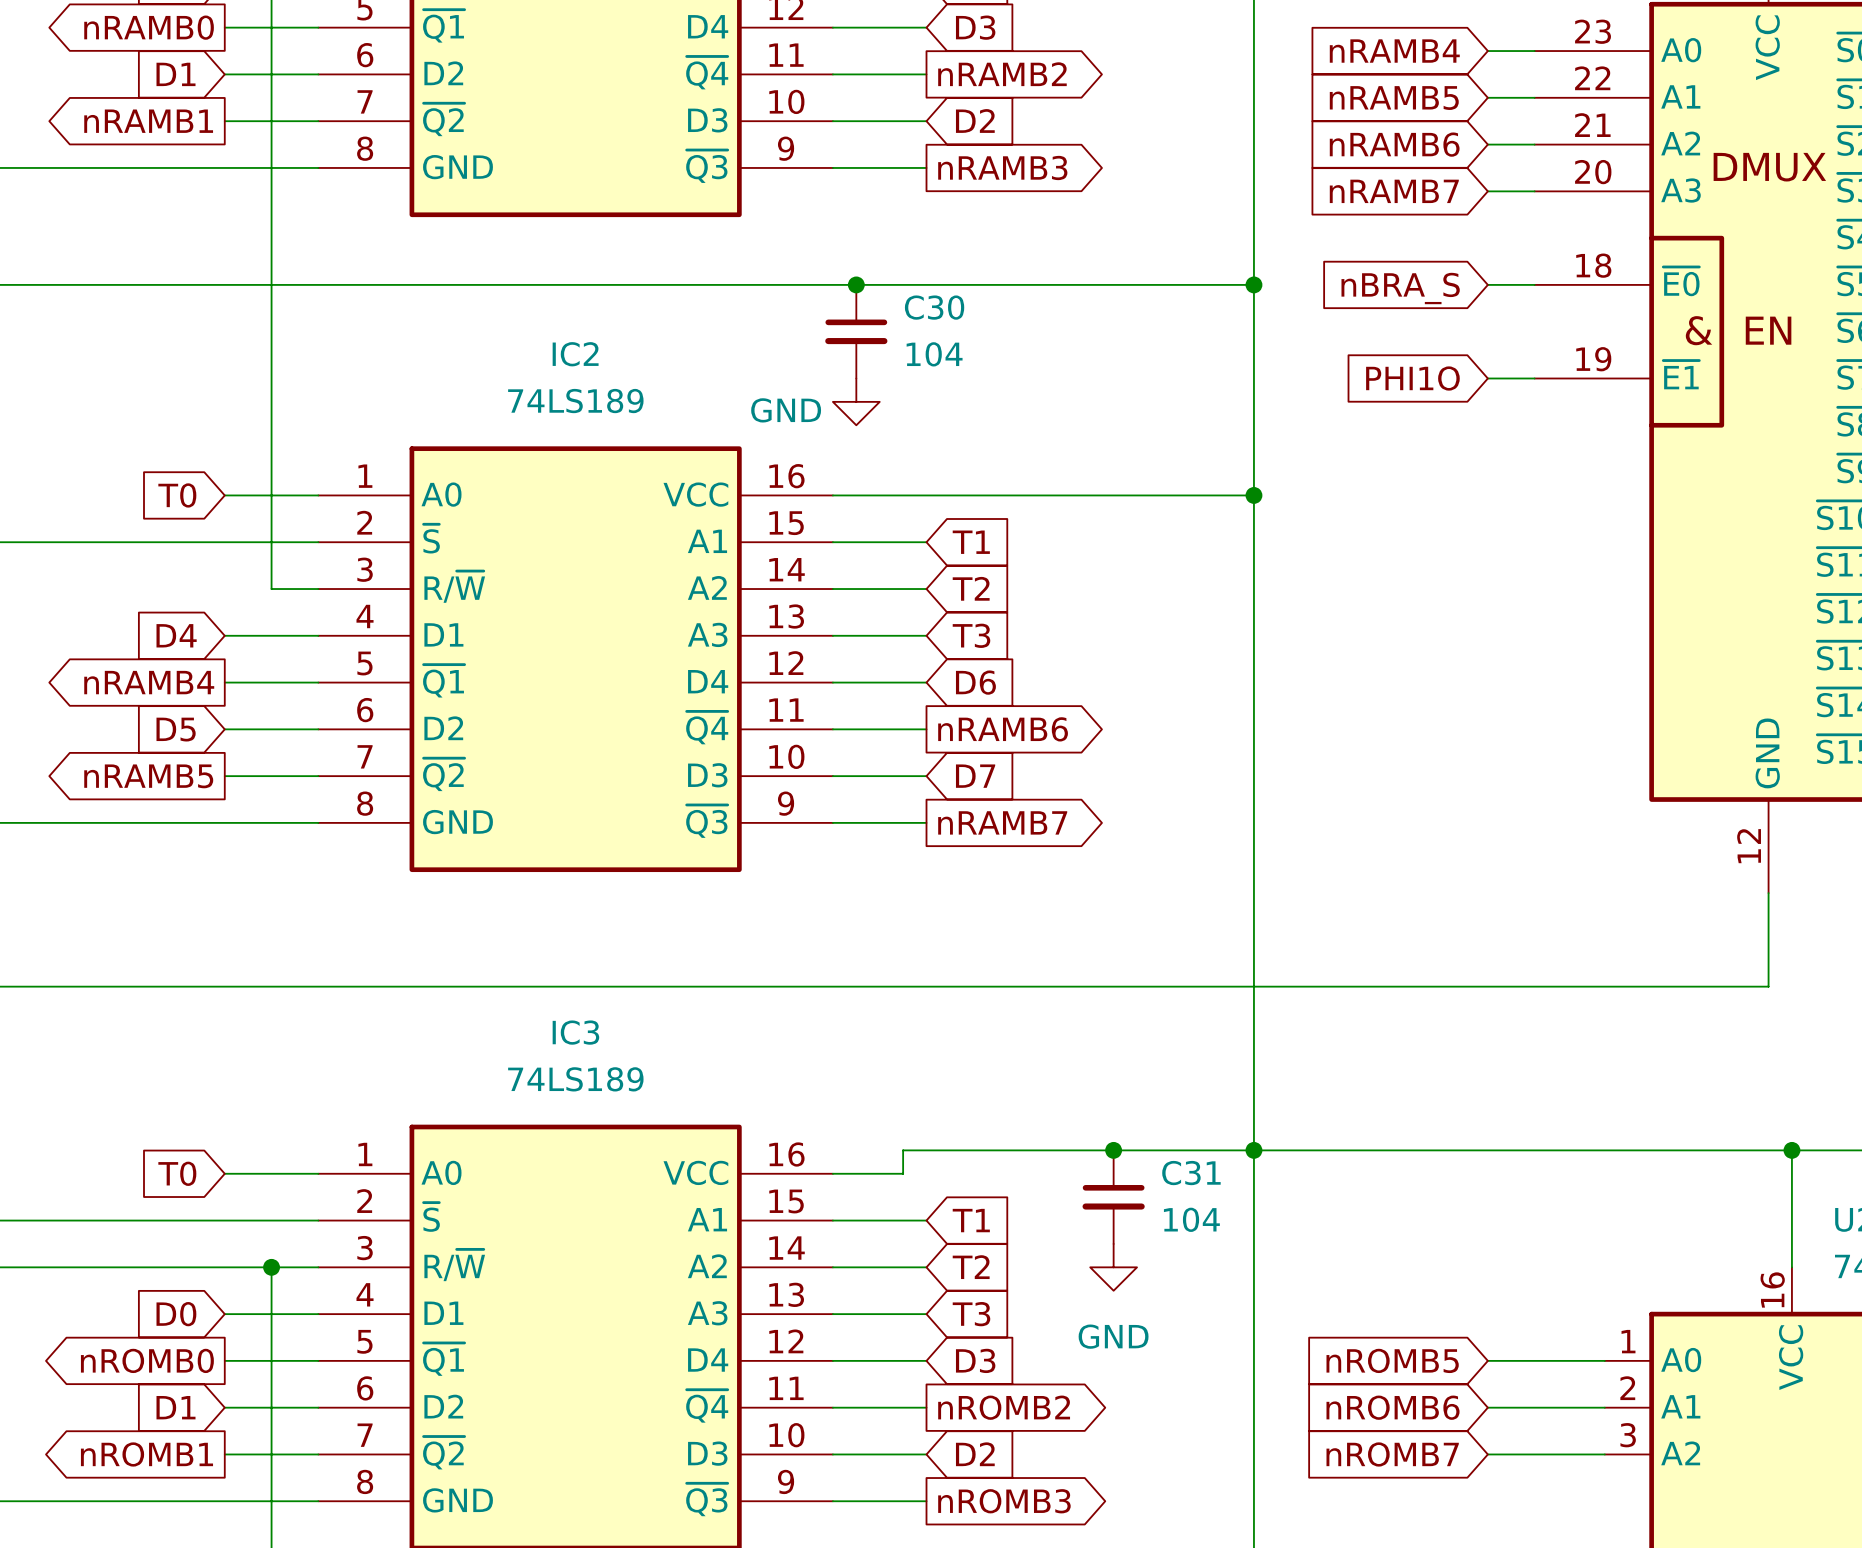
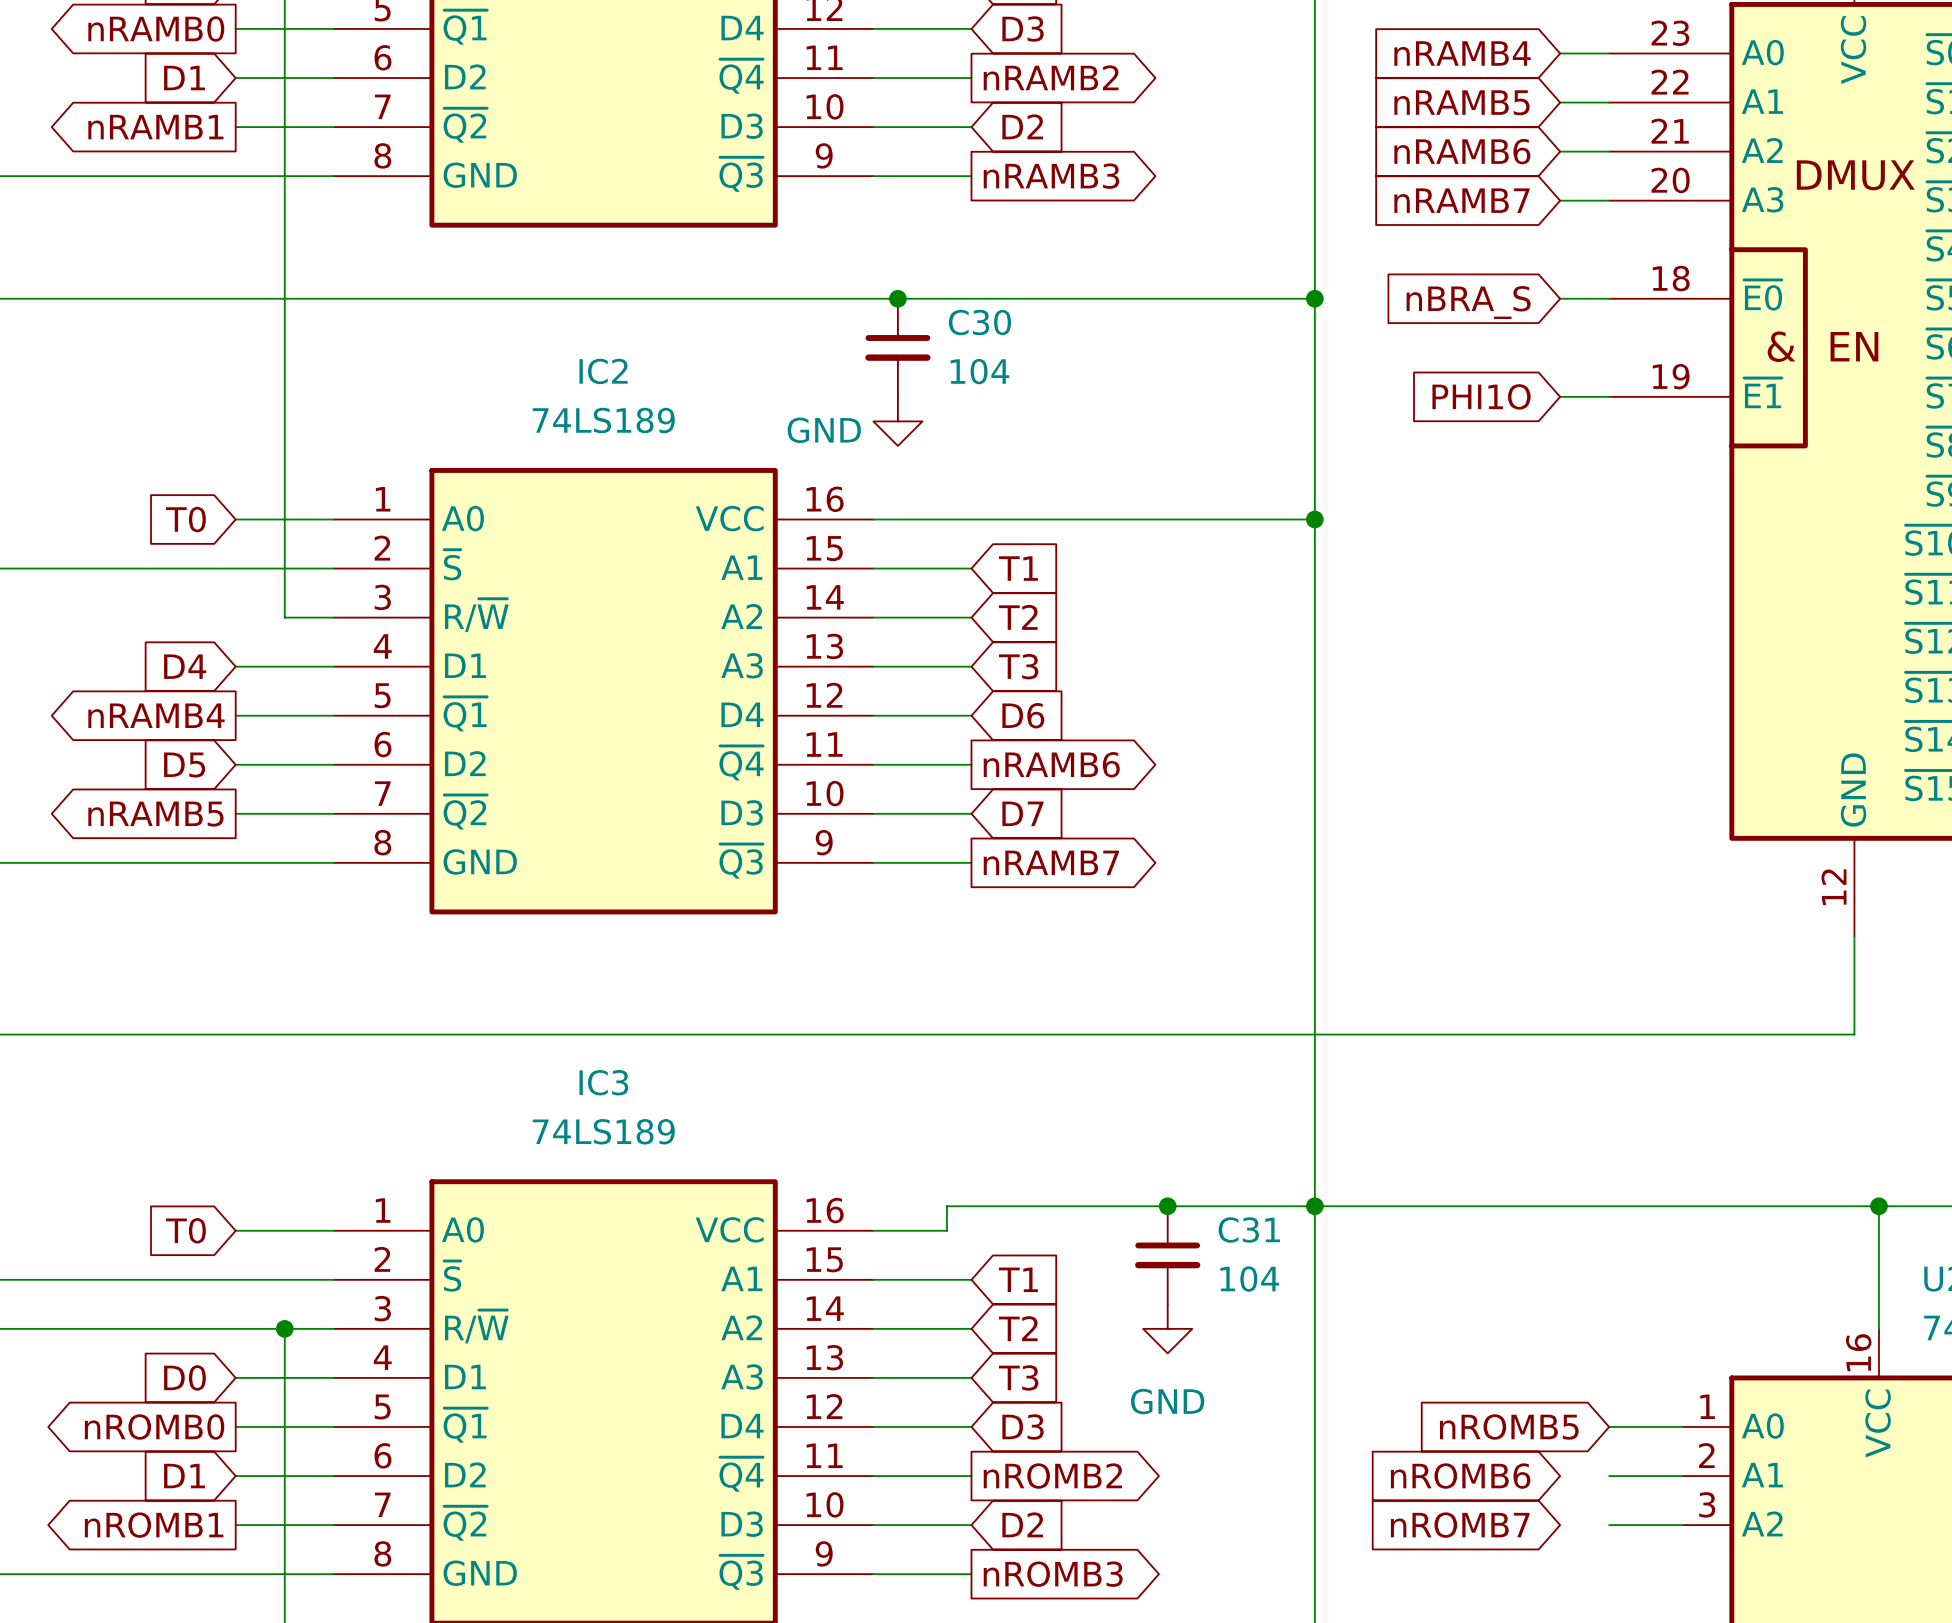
global label position: nROMB5 (1392, 1360) -> nROMB5 (1509, 1427)
wire: (1487, 1360) (1534, 1360) -> none
wire: (1487, 1407) (1534, 1407) -> none
wire: (1487, 1454) (1534, 1454) -> none

